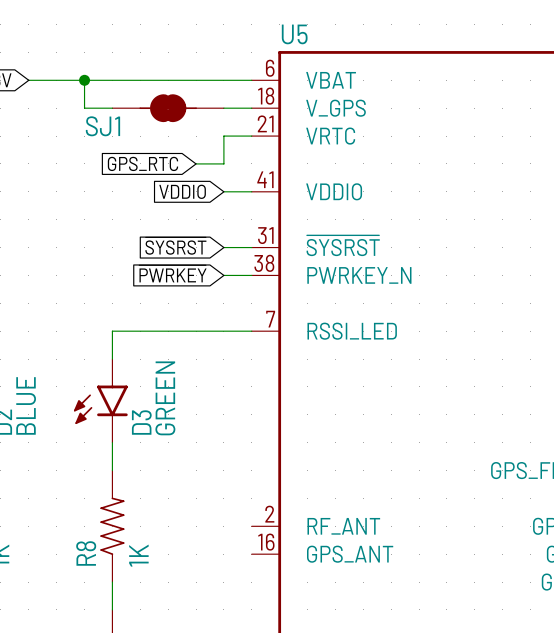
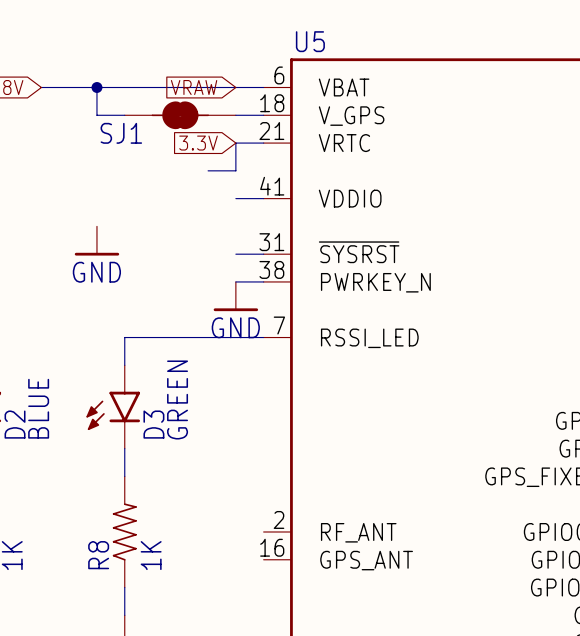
global label: none -> VRAW (194, 87)
global label: none -> 3.3V (198, 143)
global label: GPS_RTC (142, 163) -> none
global label: VDDIO (182, 191) -> none
power symbol: none -> GND (96, 240)
global label: ~{SYSRST} (175, 246) -> none
global label: ~{PWRKEY} (172, 273) -> none
power symbol: none -> GND (235, 296)

